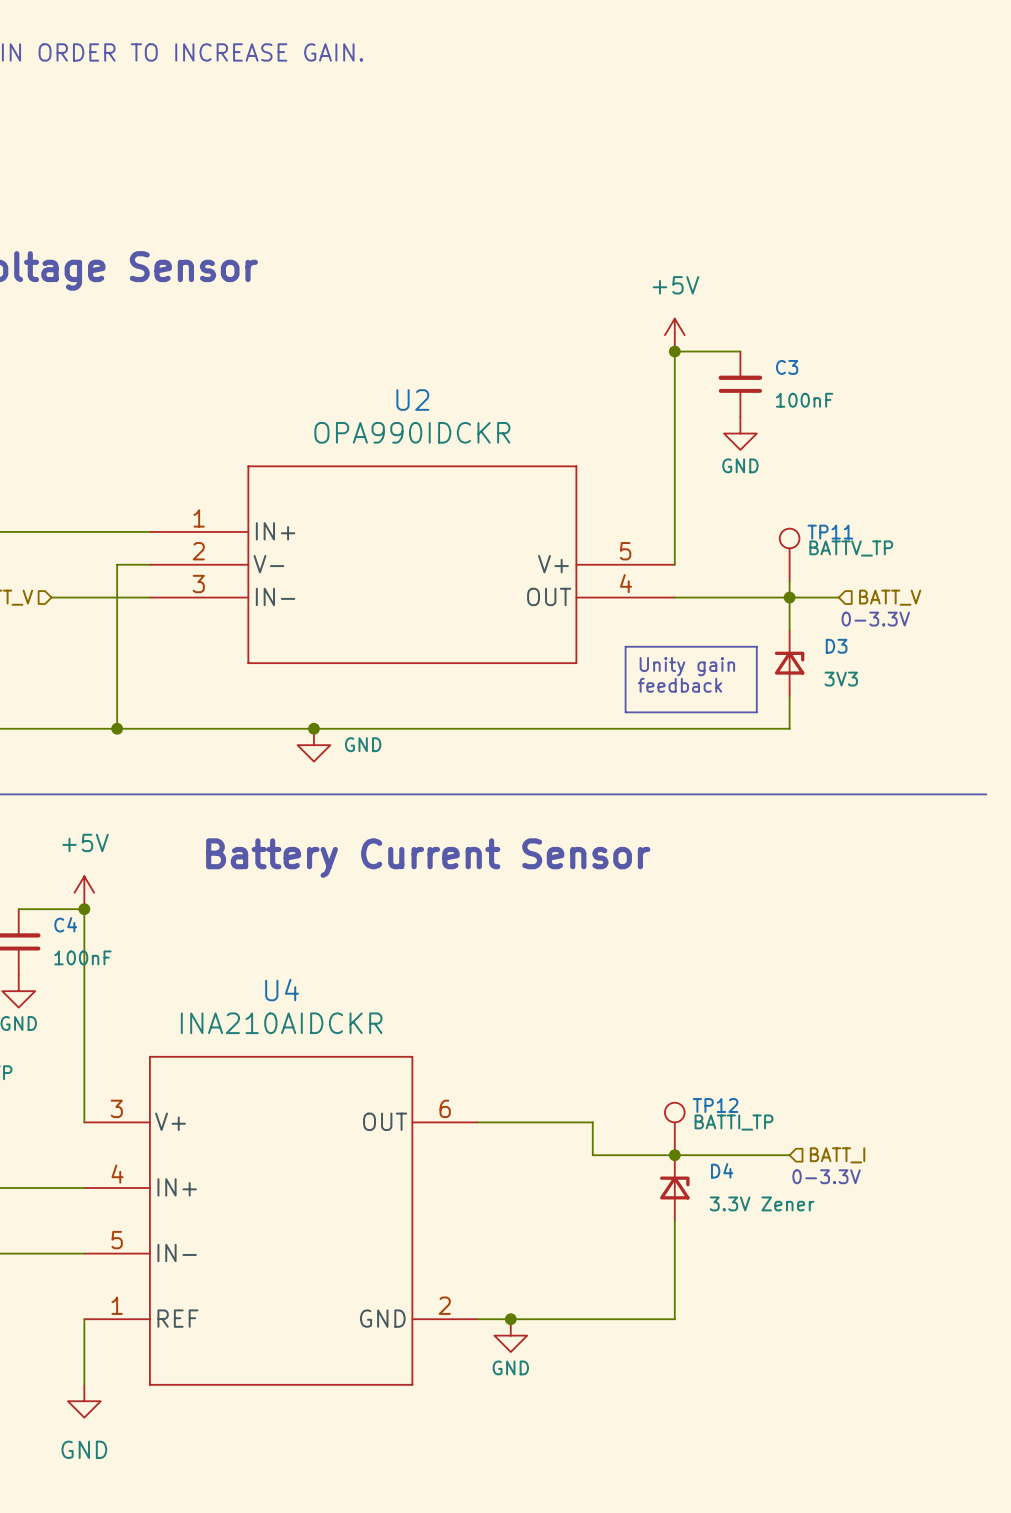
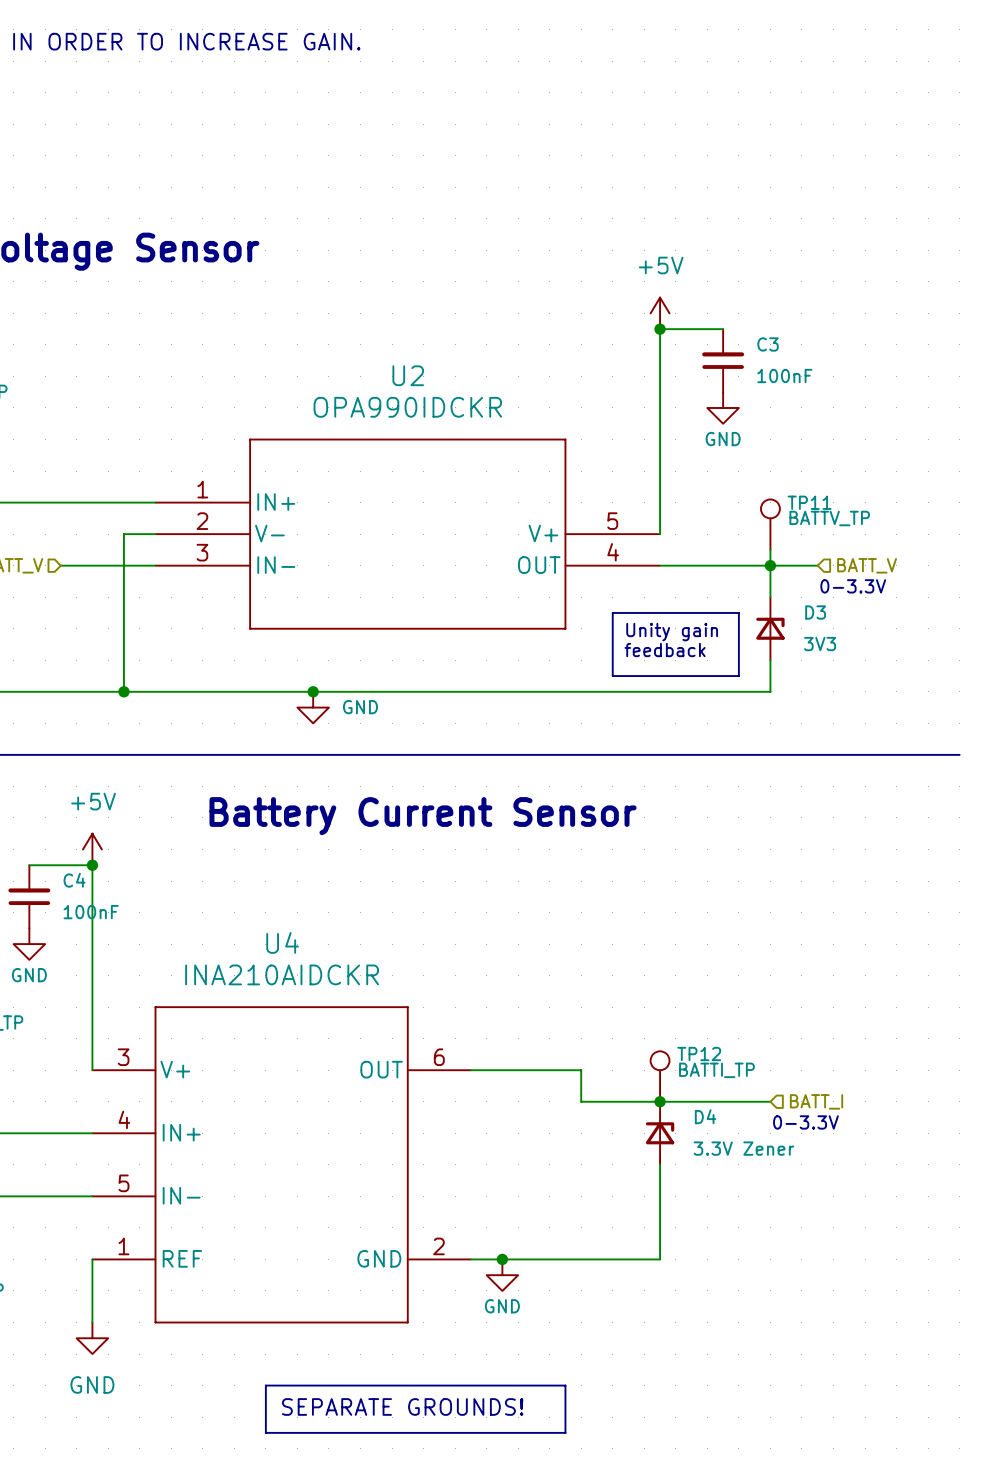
line: none -> (265, 1385) (565, 1385) (565, 1432) (265, 1432) (265, 1385)
text: none -> SEPARATE GROUNDS! (402, 1406)

